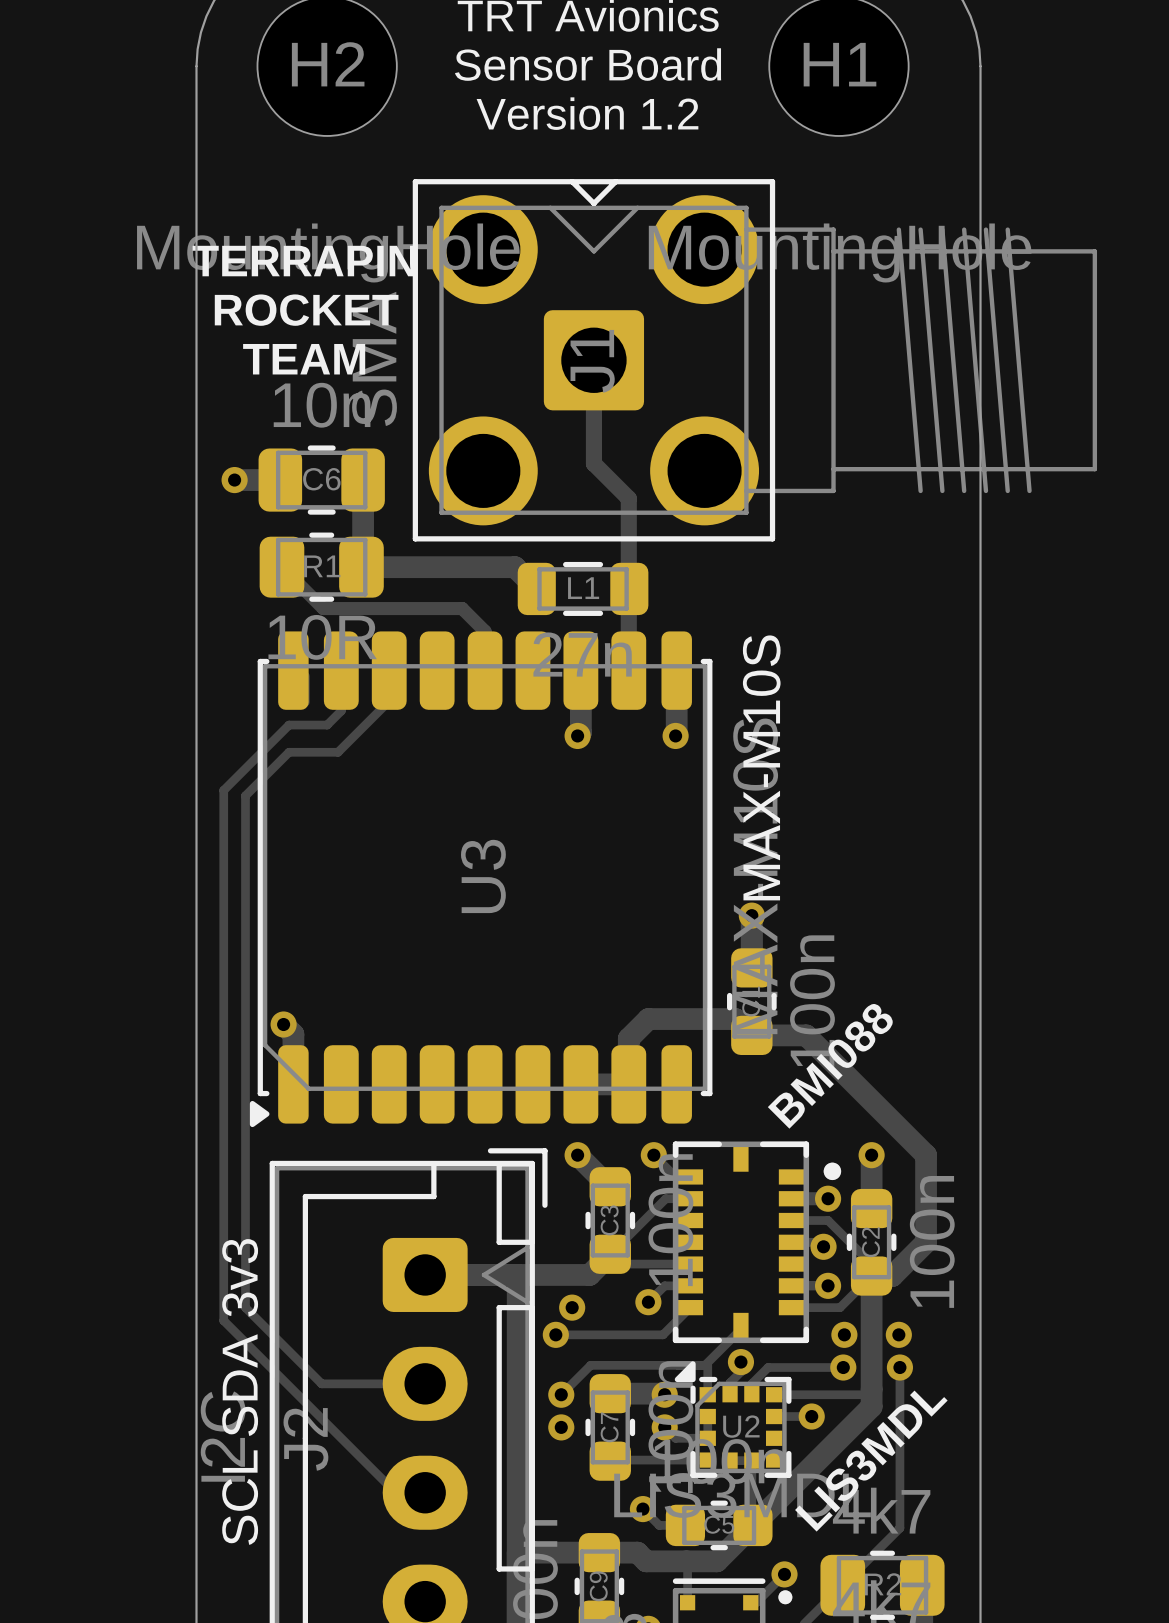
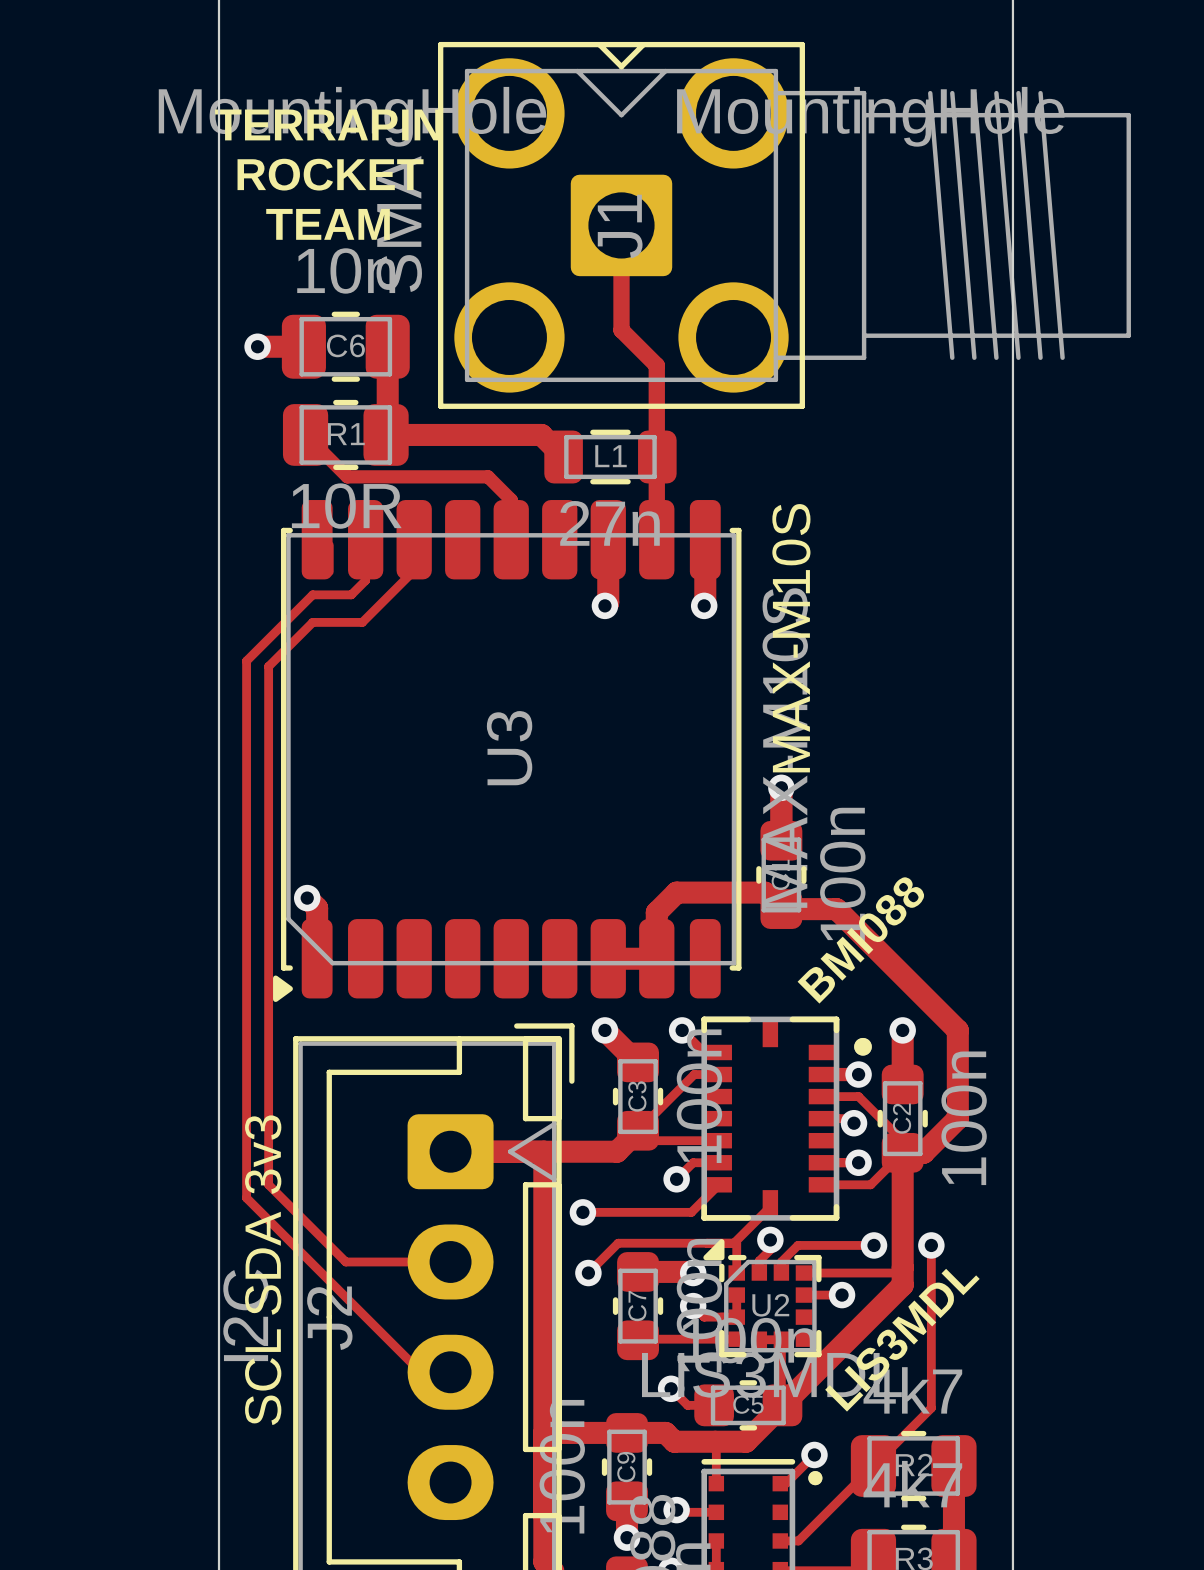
via: (572, 1307) -> none
via: (844, 1334) -> none
via: (898, 1334) -> none
via: (561, 1427) -> none

